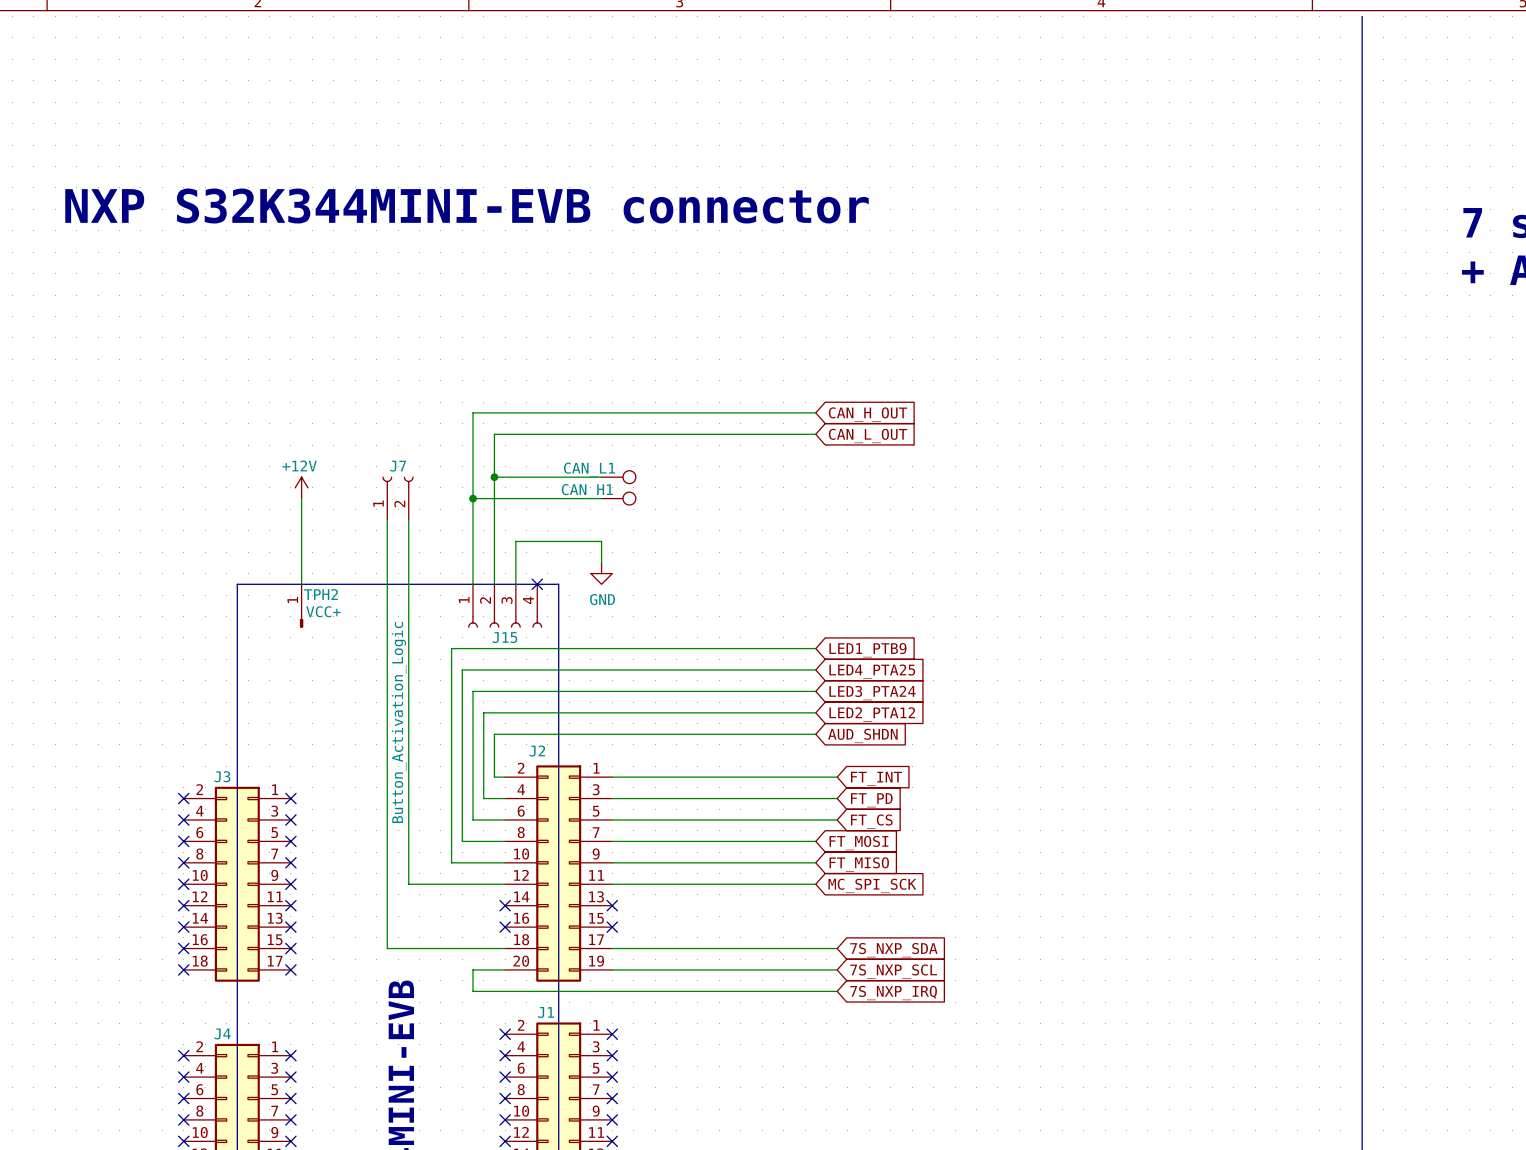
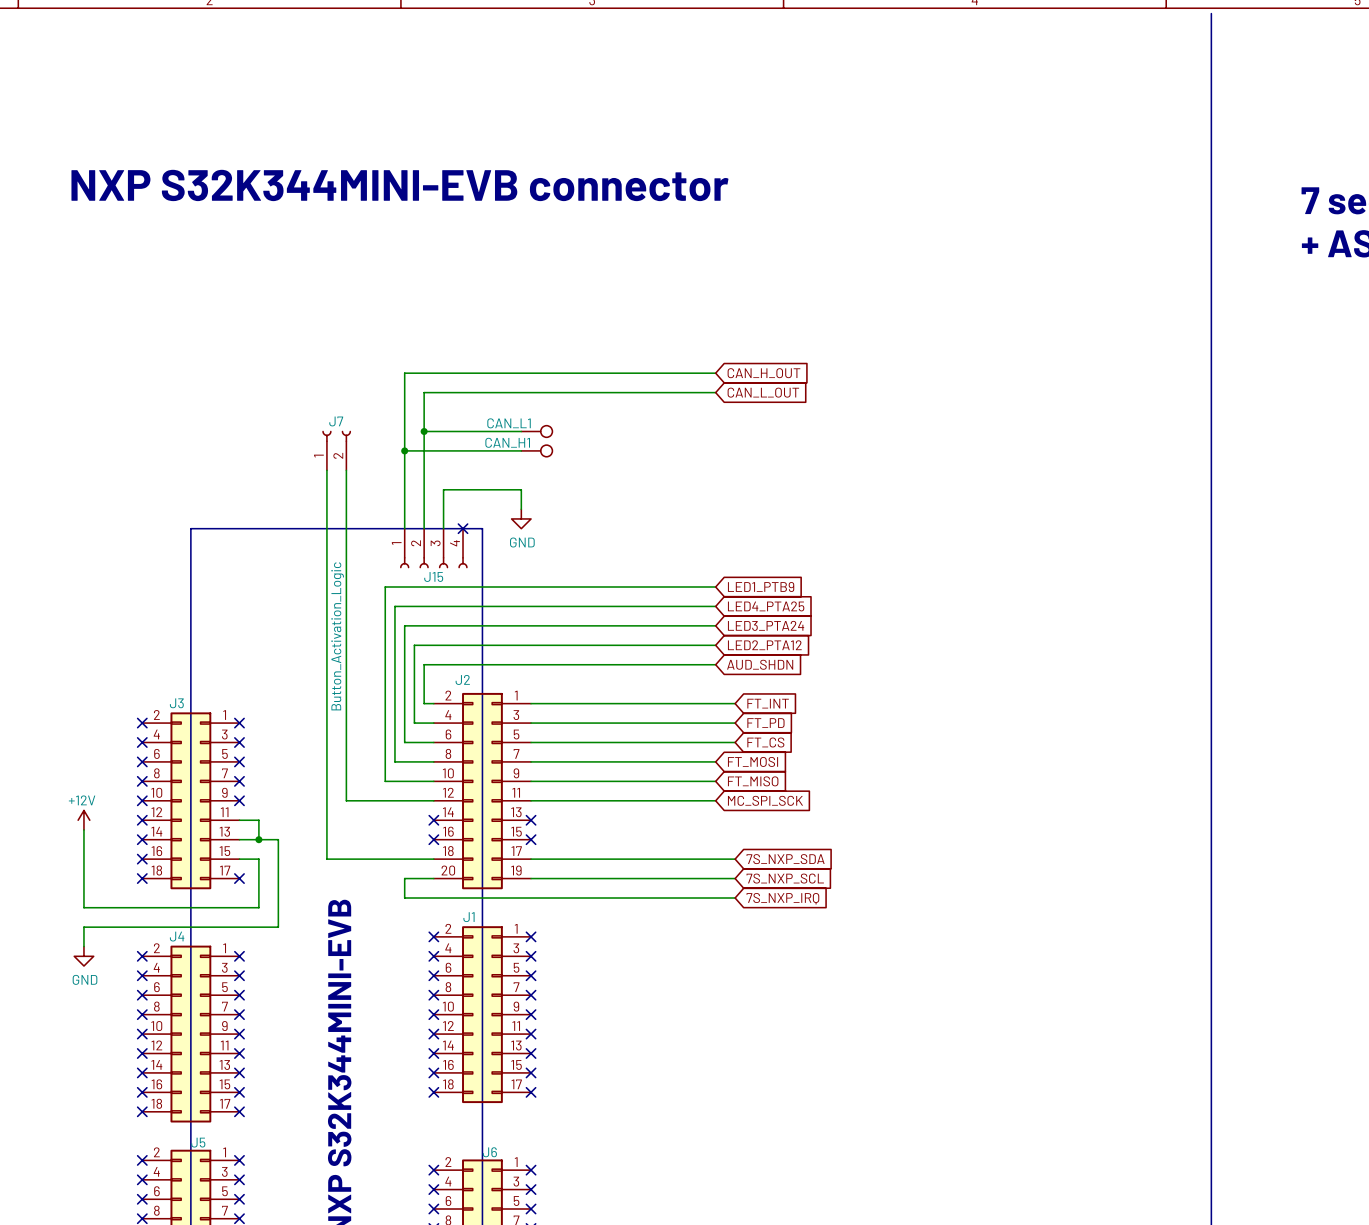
power symbol: +12V (301, 487) -> none
wire: (301, 498) (301, 584) -> none
TPH2: VCC+ (301, 606) -> none
power symbol: none -> +12V (83, 820)
wire: none -> (239, 820) (258, 820) (258, 839)
no-connect mark: (290, 905) -> none
wire: none -> (83, 829) (83, 907) (258, 907) (258, 859) (239, 859)
wire: none -> (239, 839) (278, 839) (278, 927) (83, 927) (83, 946)
no-connect mark: (290, 927) -> none
junction: none -> (258, 839)
no-connect mark: (290, 948) -> none
power symbol: none -> GND (83, 956)

